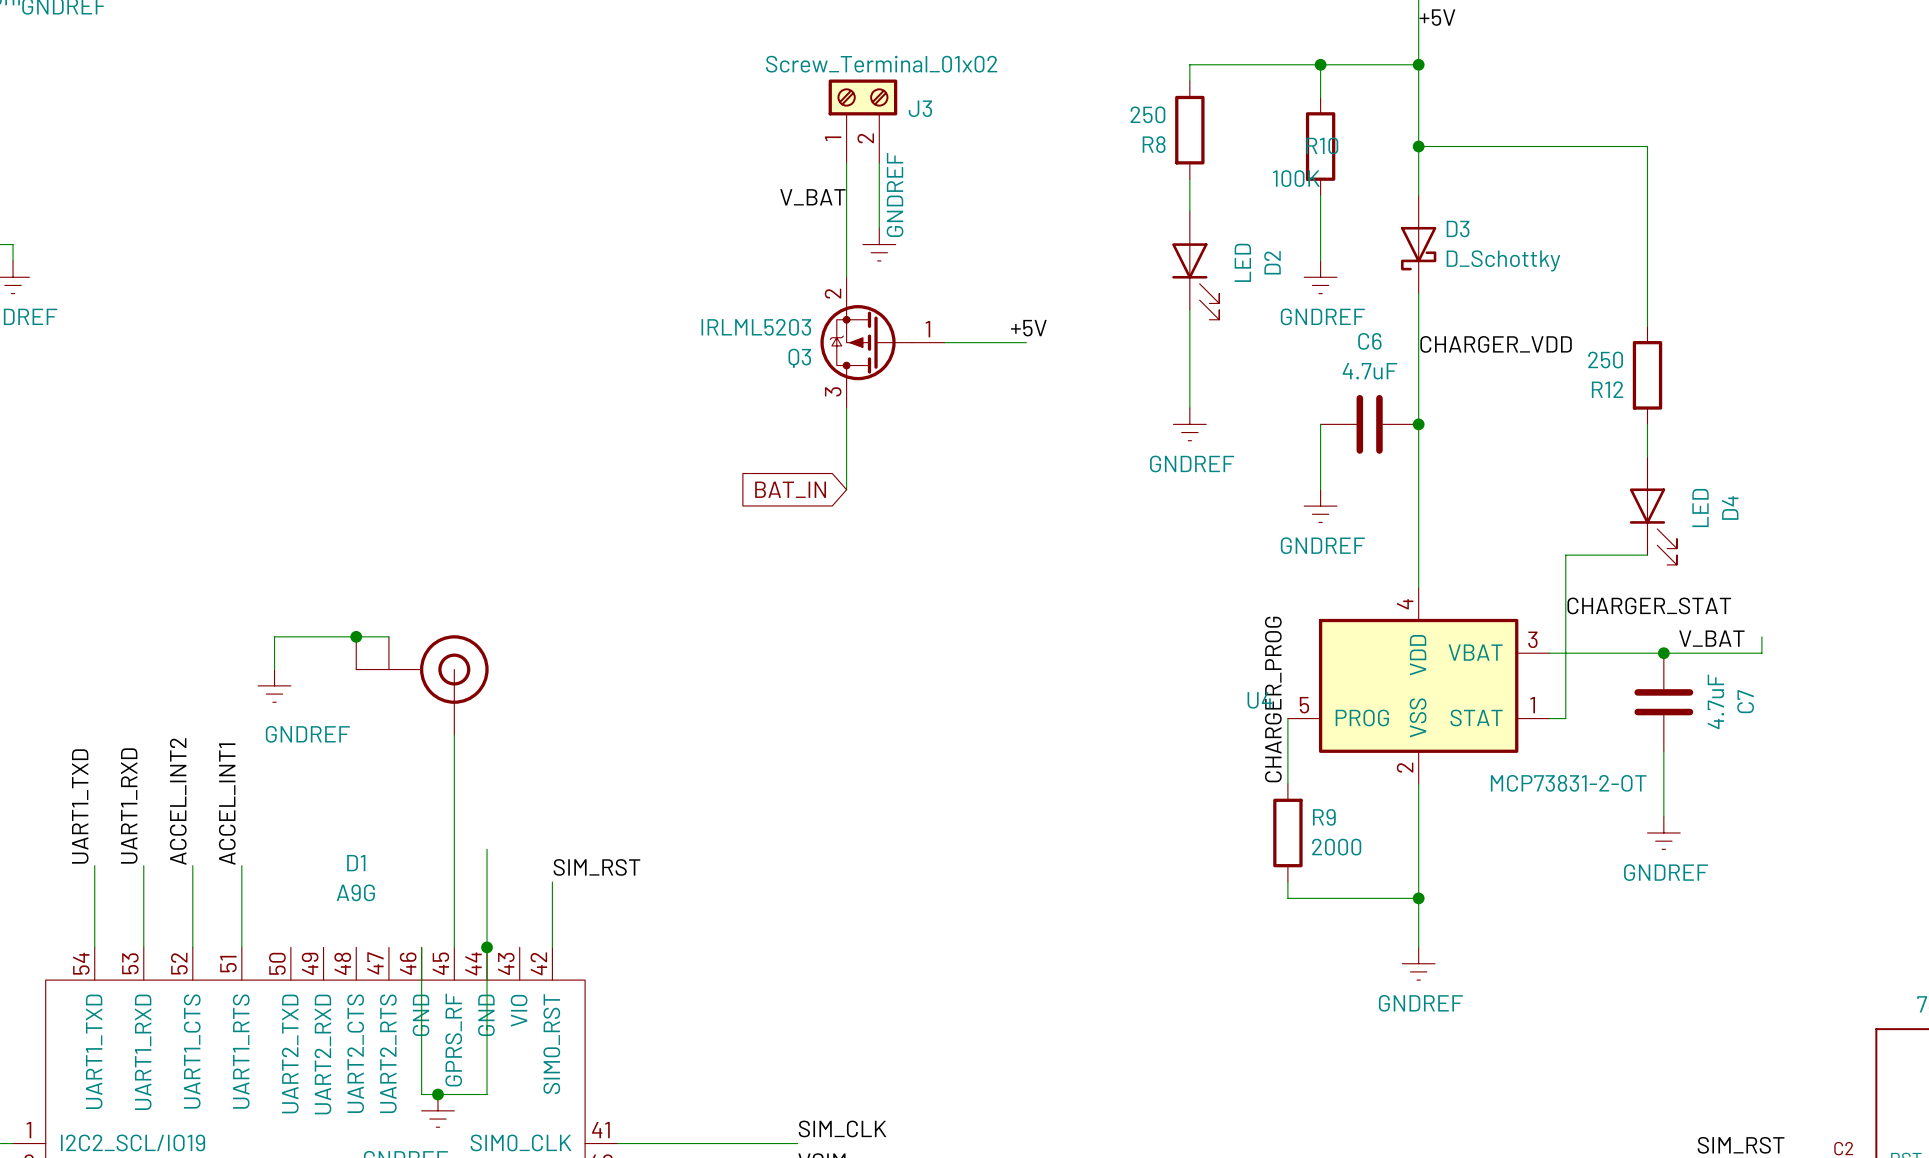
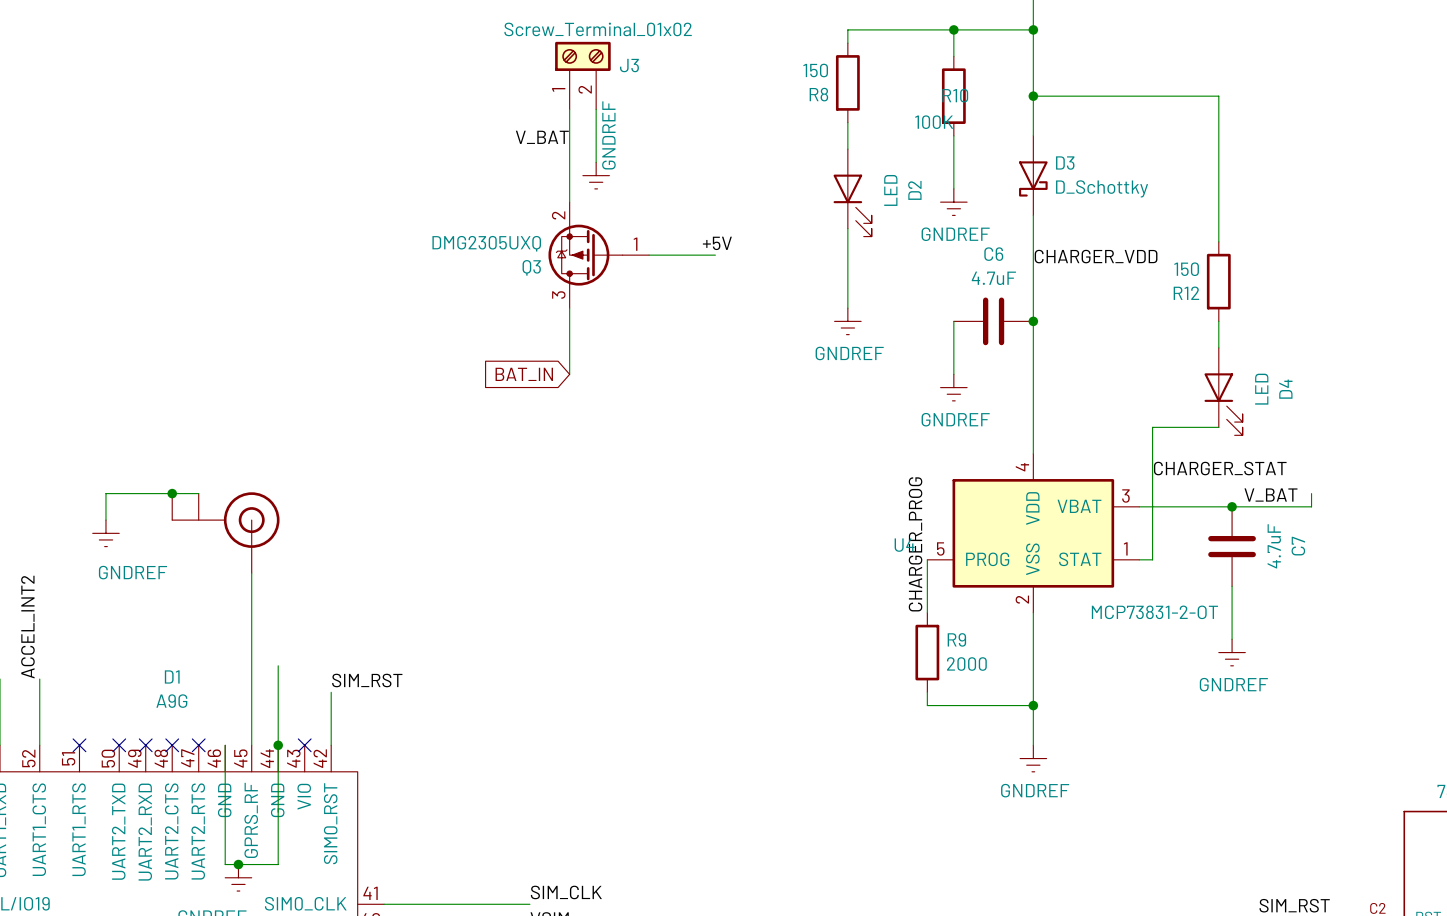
R8 value: 250 (1147, 114) -> 150 (815, 70)
Q3 value: IRLML5203 (756, 327) -> DMG2305UXQ (486, 243)
R12 value: 250 (1605, 360) -> 150 (1186, 269)
label: ACCEL_INT1 (227, 804) -> none
wire: (241, 865) (241, 947) -> none
no-connect mark: none -> (79, 745)
no-connect mark: none -> (119, 745)
no-connect mark: none -> (145, 745)
no-connect mark: none -> (172, 745)
no-connect mark: none -> (198, 745)
no-connect mark: none -> (304, 745)

